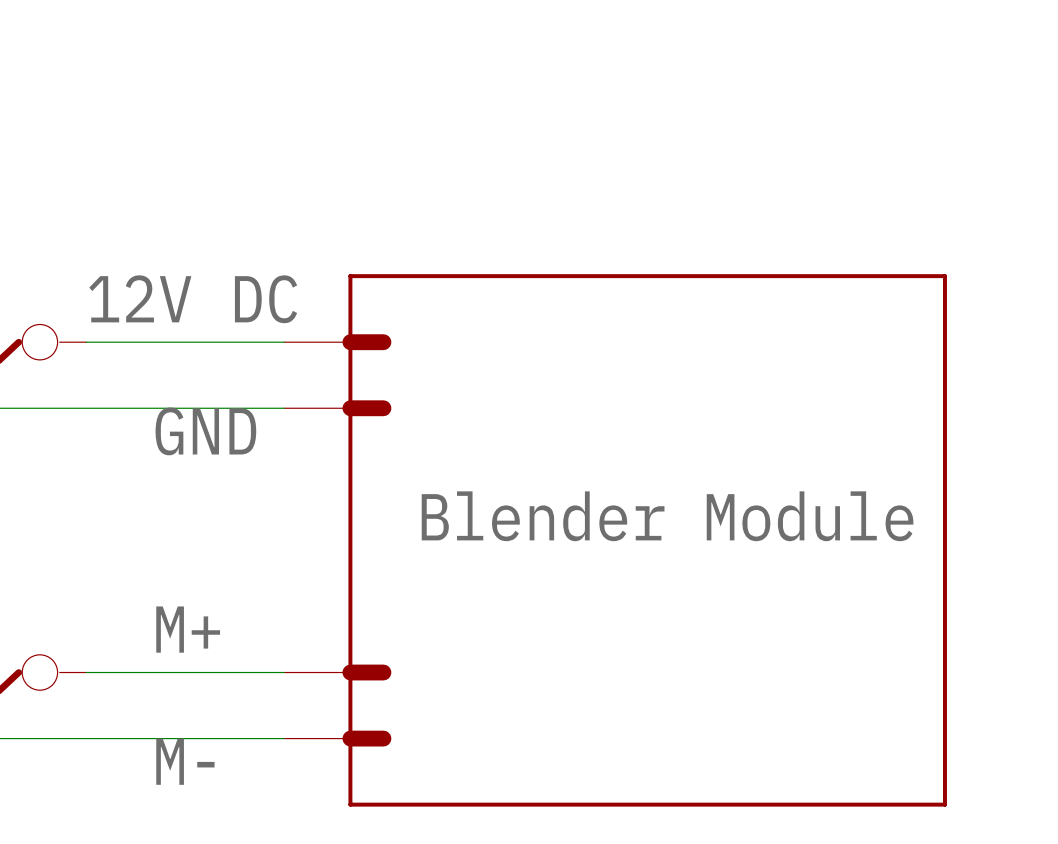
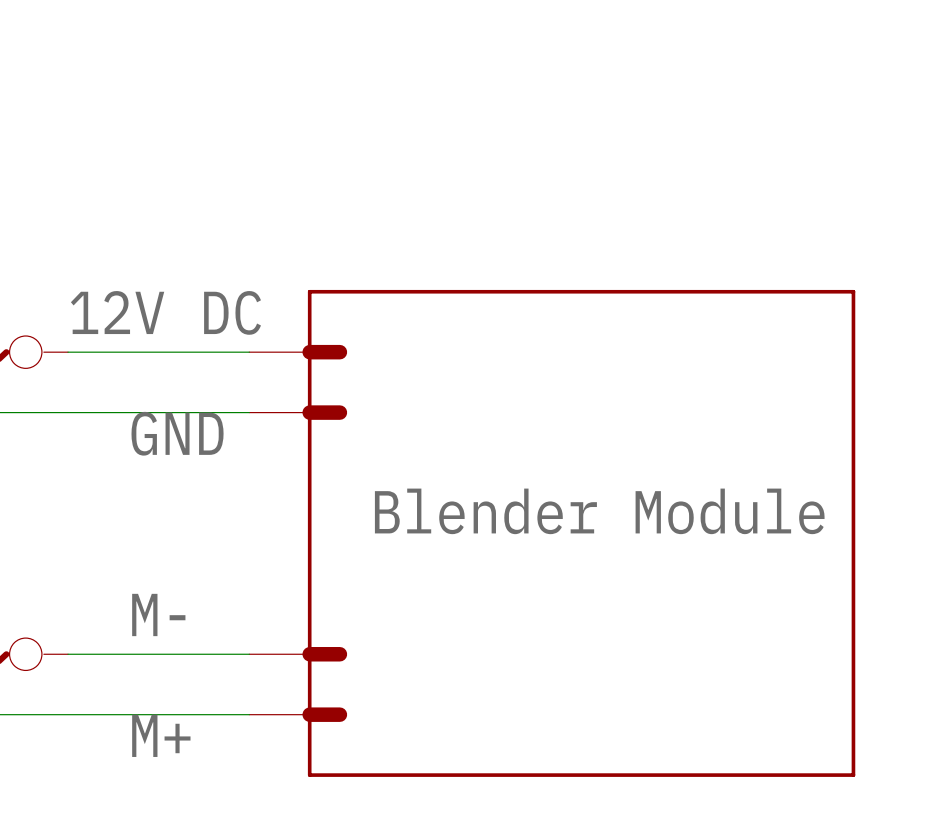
text: M+ (188, 629) -> M- (158, 614)
text: M- (185, 761) -> M+ (161, 735)

